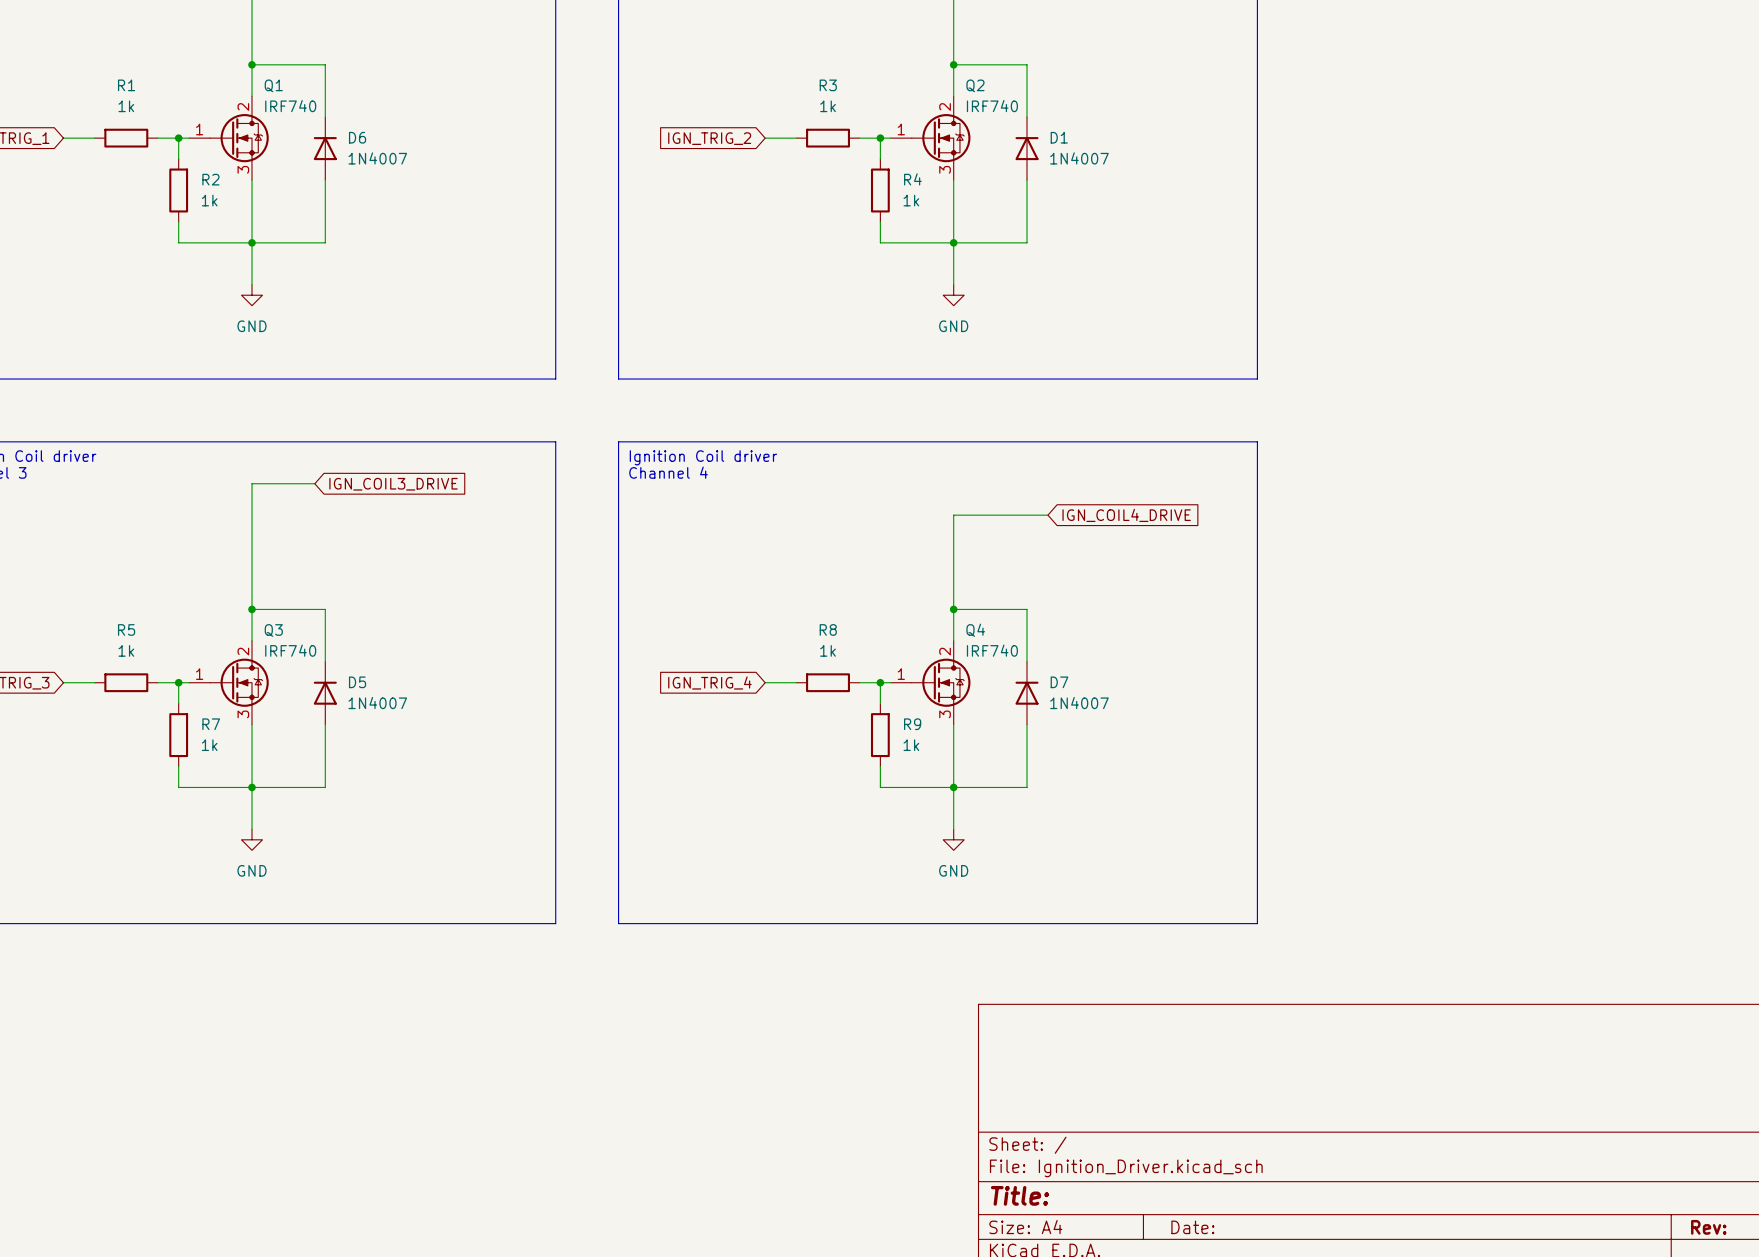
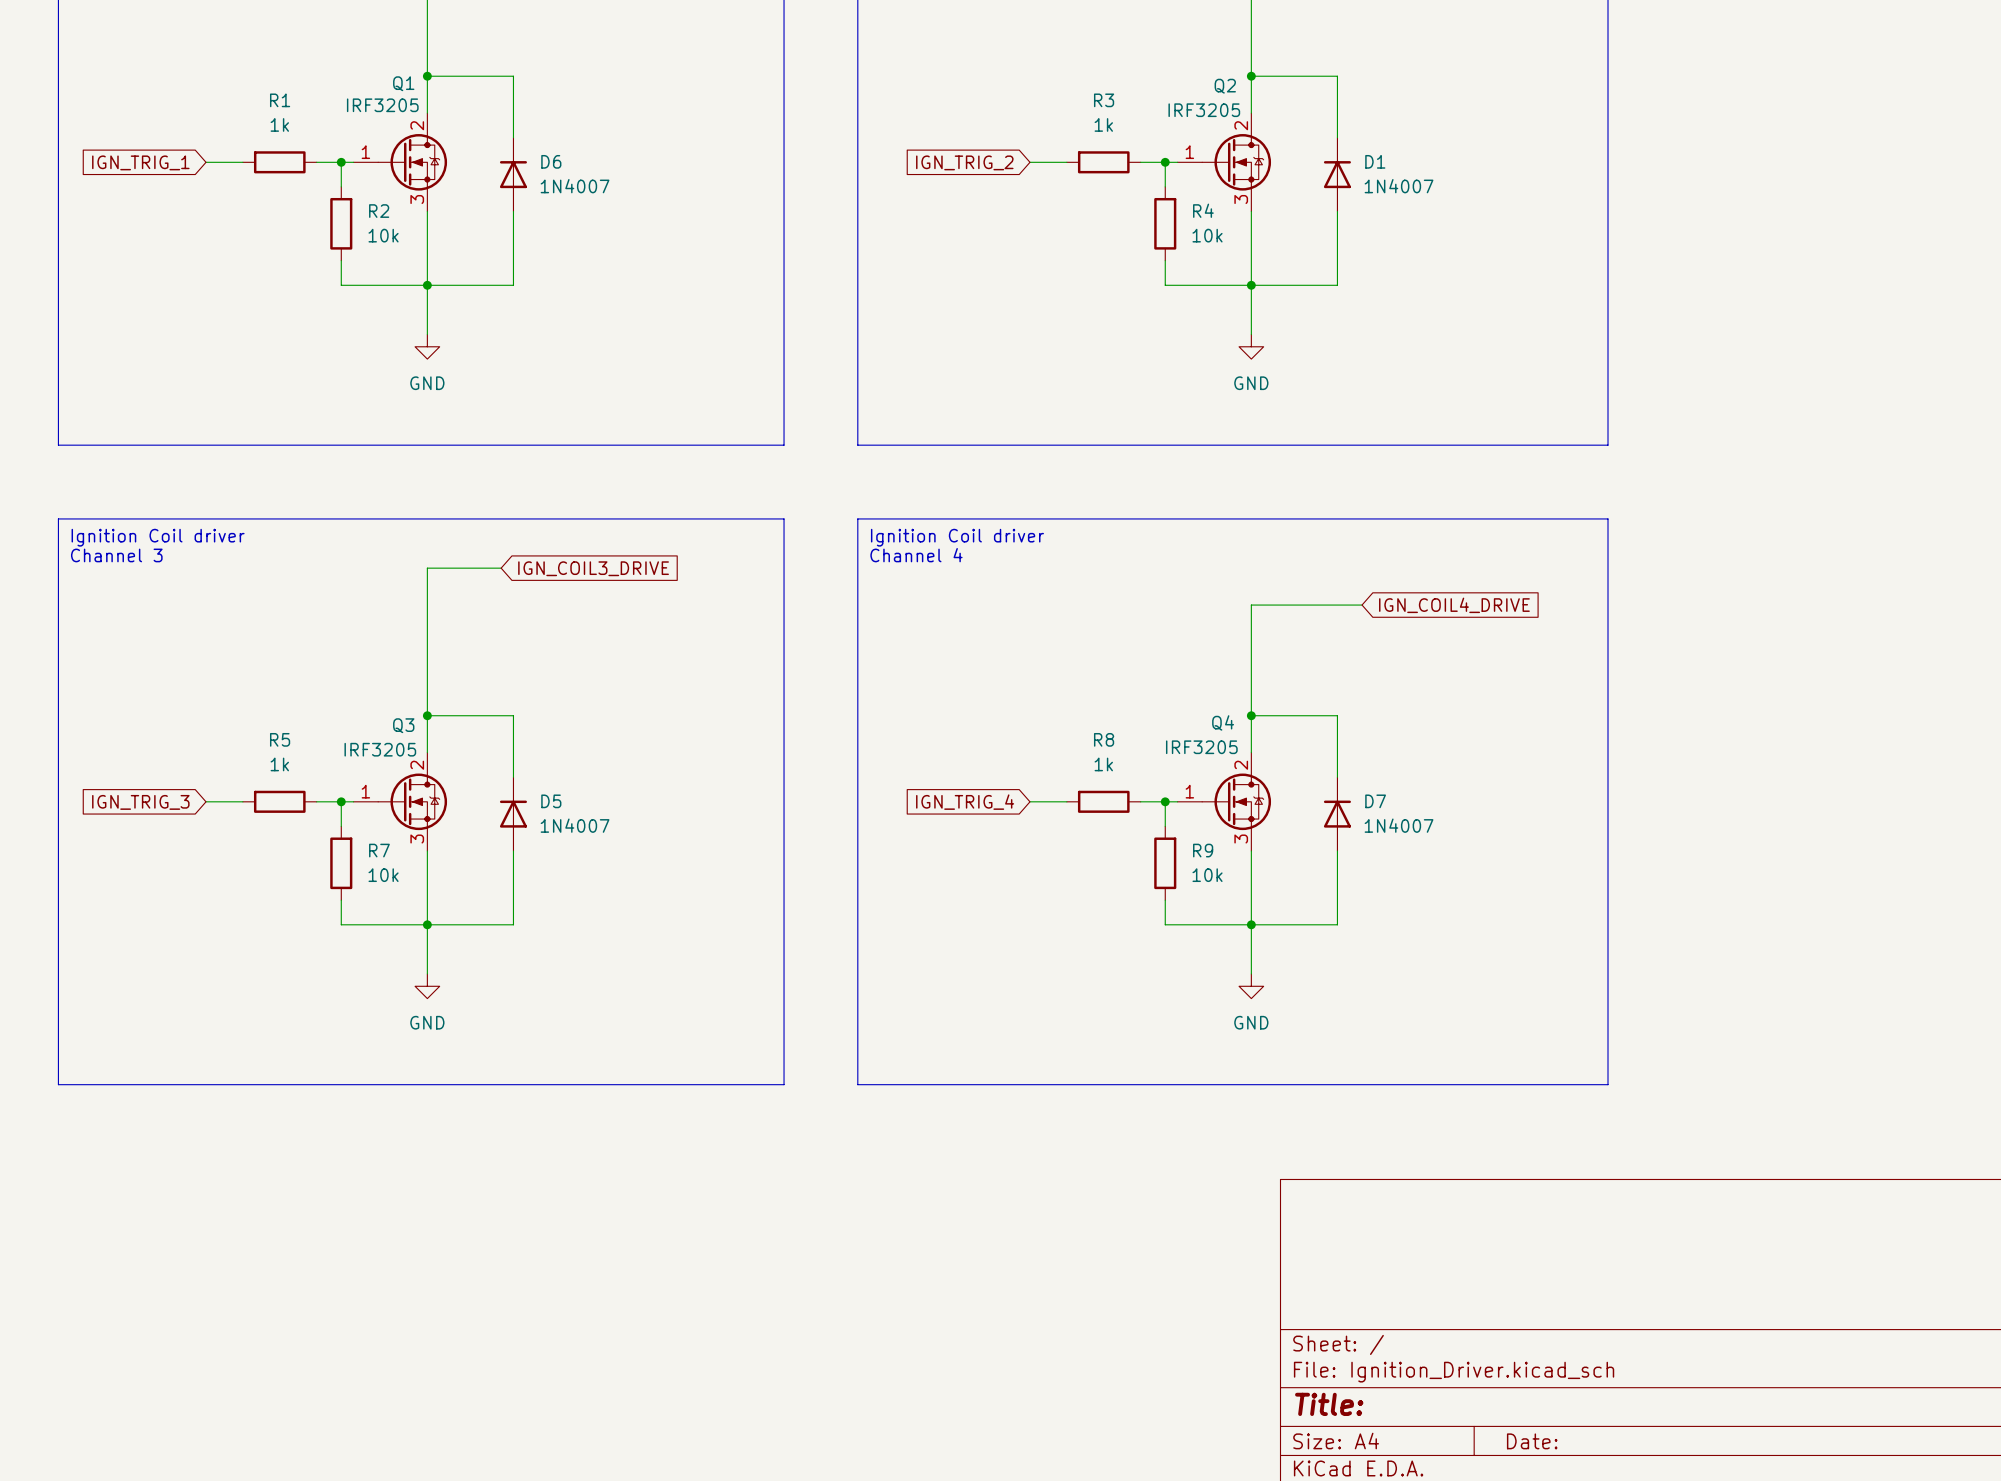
Q1 name position: Q1 (273, 85) -> Q1 (403, 83)
Q2 name position: Q2 (975, 85) -> Q2 (1225, 86)
Q1 value: IRF740 (290, 106) -> IRF3205 (382, 105)
Q2 value: IRF740 (992, 106) -> IRF3205 (1204, 110)
R2 value: 1k (209, 200) -> 10k (383, 235)
R4 value: 1k (911, 200) -> 10k (1207, 235)
Q3 name position: Q3 (273, 630) -> Q3 (403, 725)
Q4 name position: Q4 (975, 630) -> Q4 (1223, 722)
Q3 value: IRF740 (290, 650) -> IRF3205 (380, 749)
Q4 value: IRF740 (992, 650) -> IRF3205 (1201, 747)
R7 value: 1k (209, 745) -> 10k (383, 875)
R9 value: 1k (911, 745) -> 10k (1207, 875)

